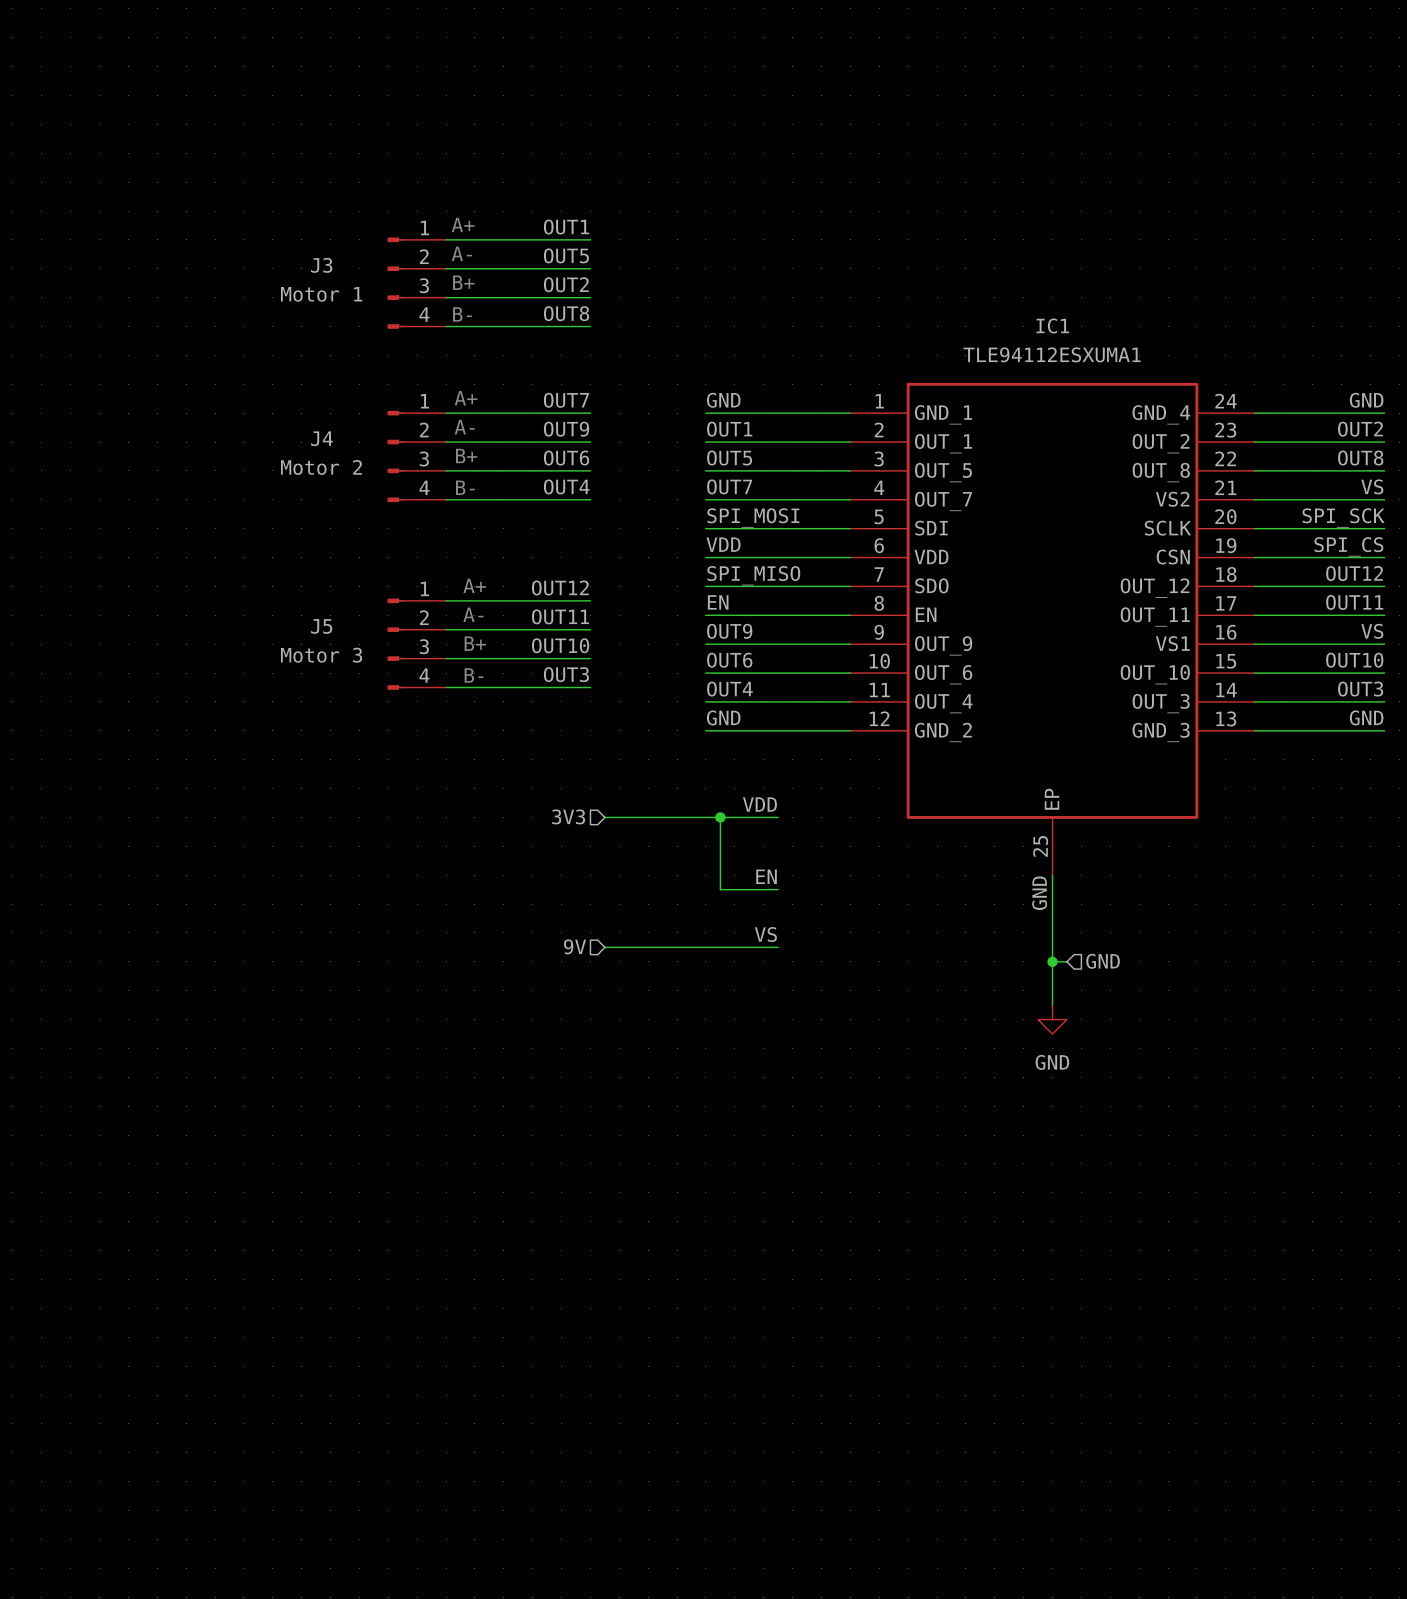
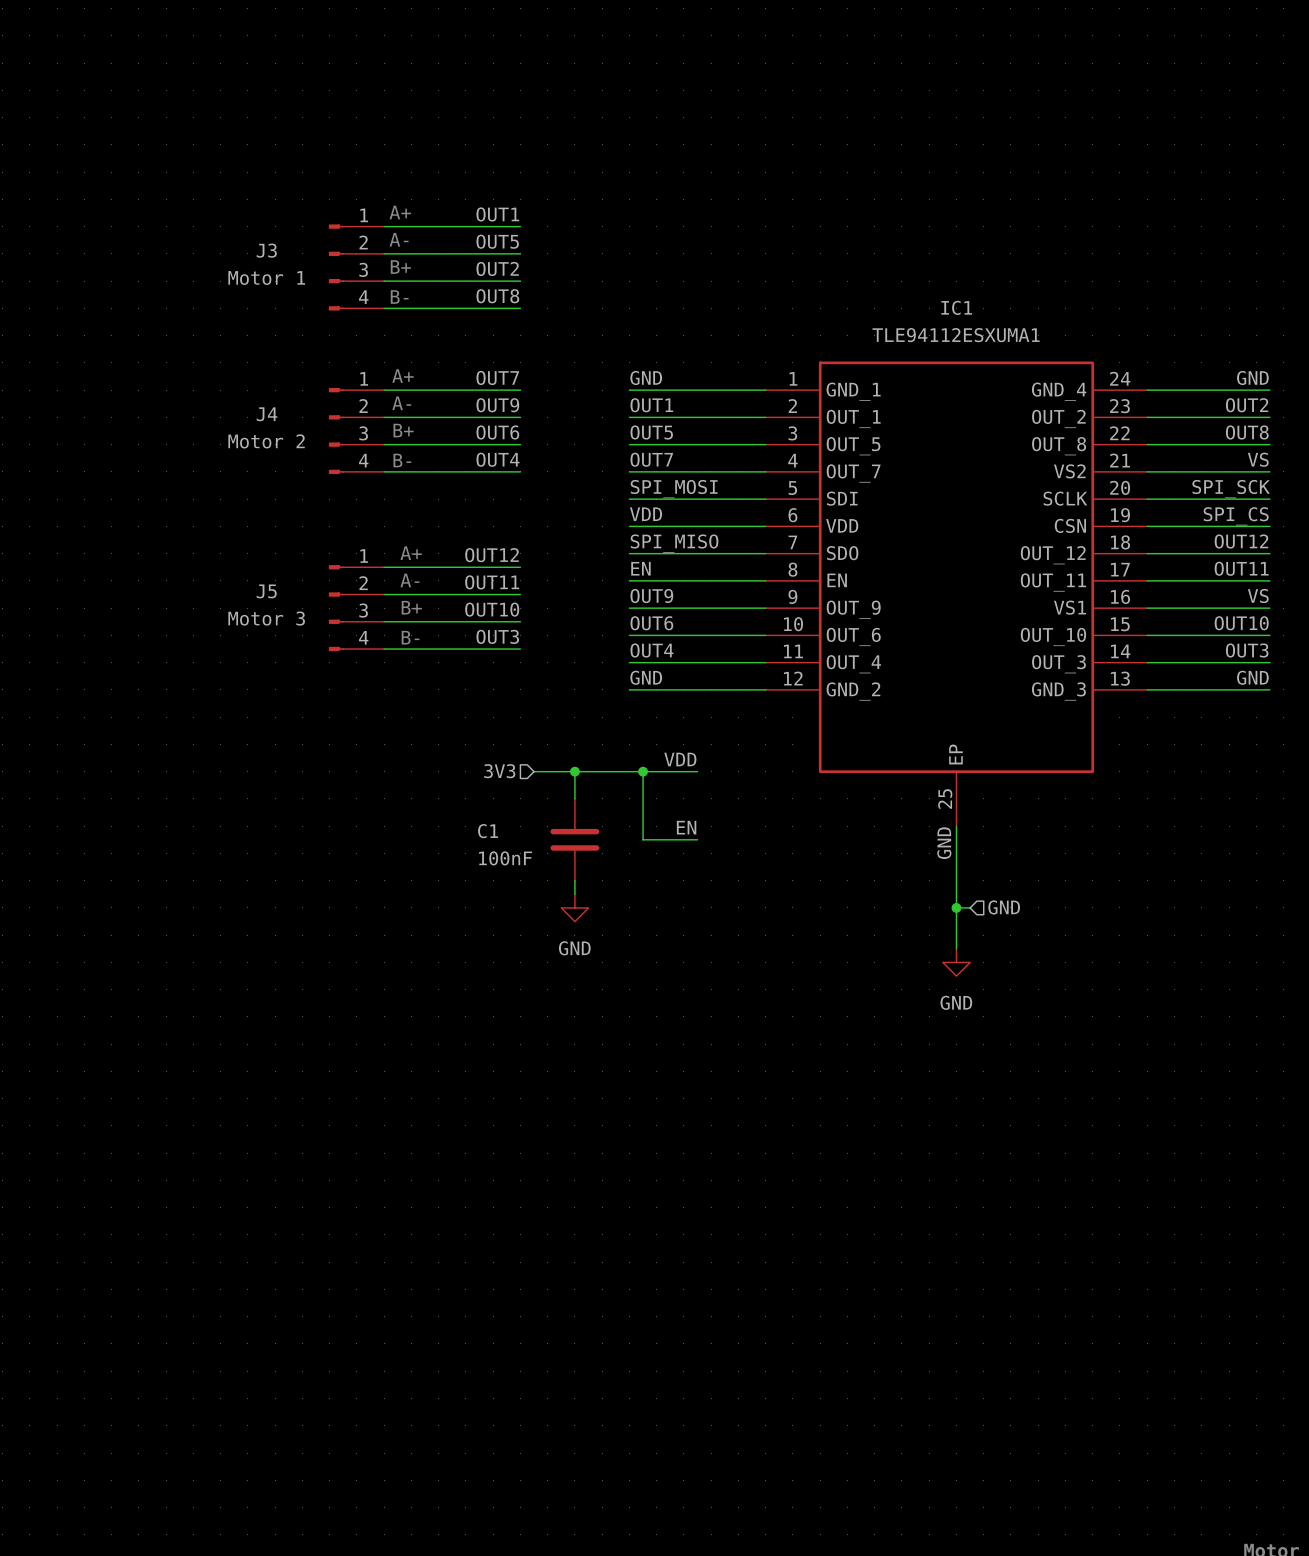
wire: none -> (574, 771) (574, 798)
junction: none -> (574, 771)
C1: none -> 100nF (574, 839)
wire: none -> (574, 880) (574, 894)
label: VS (765, 934) -> none
hierarchical label: 9V (574, 946) -> none
wire: (604, 947) (778, 947) -> none
power symbol: none -> GND (574, 907)

